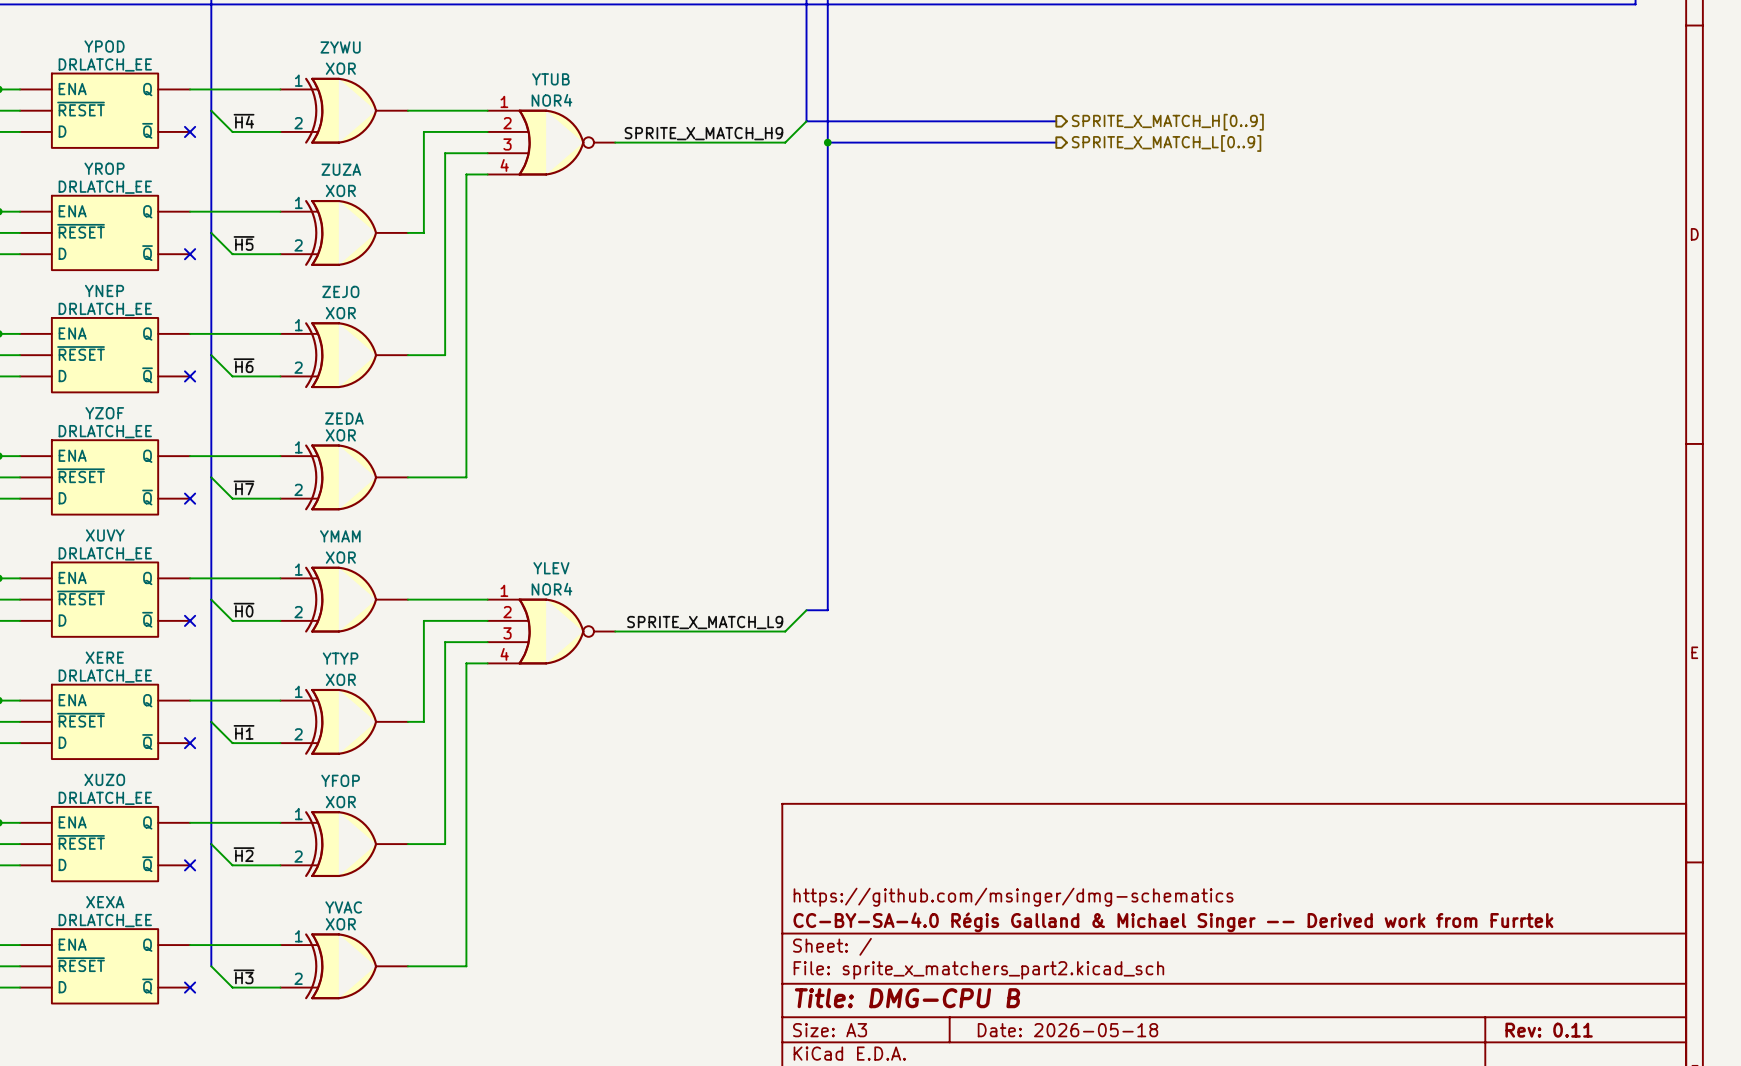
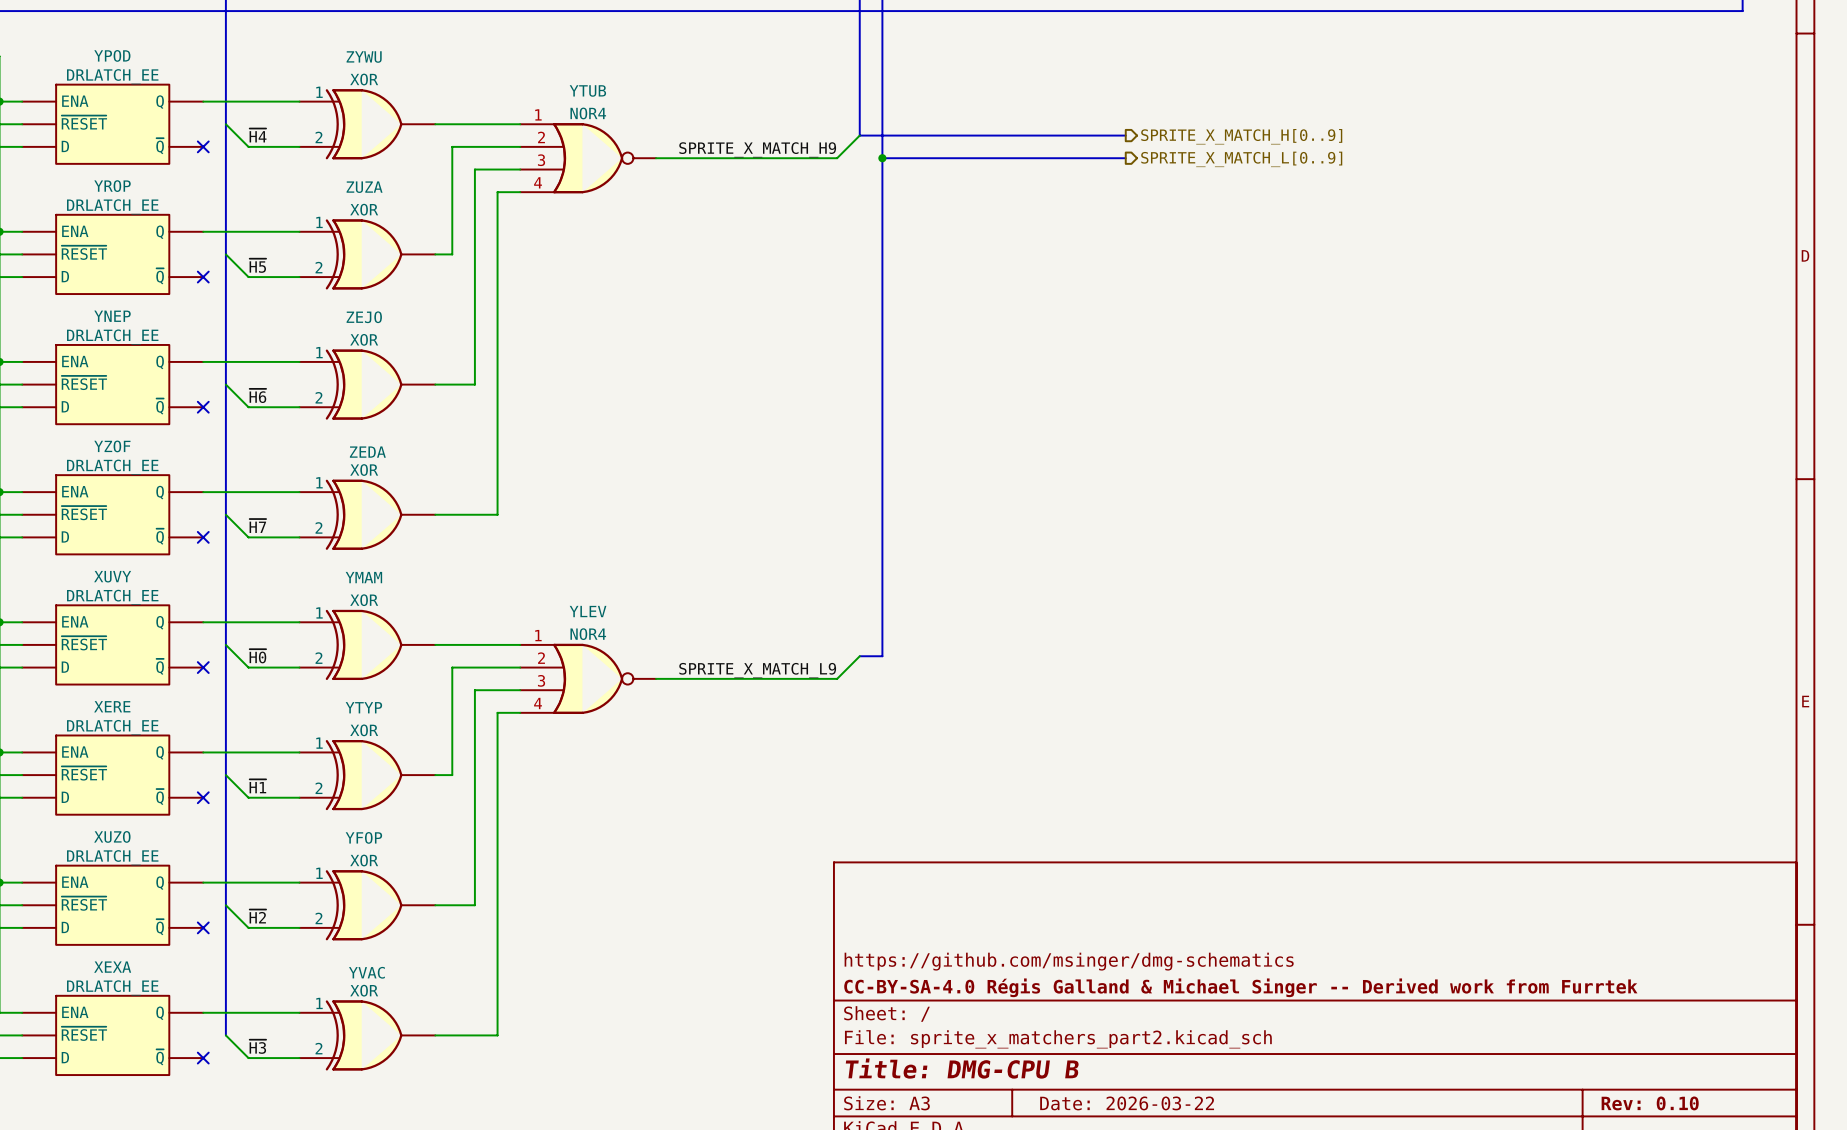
title block: Date: 2026-05-18 (1067, 1030) -> Date: 2026-03-22 (1127, 1103)
title block: Rev: 0.11 (1549, 1030) -> Rev: 0.10 (1650, 1103)

